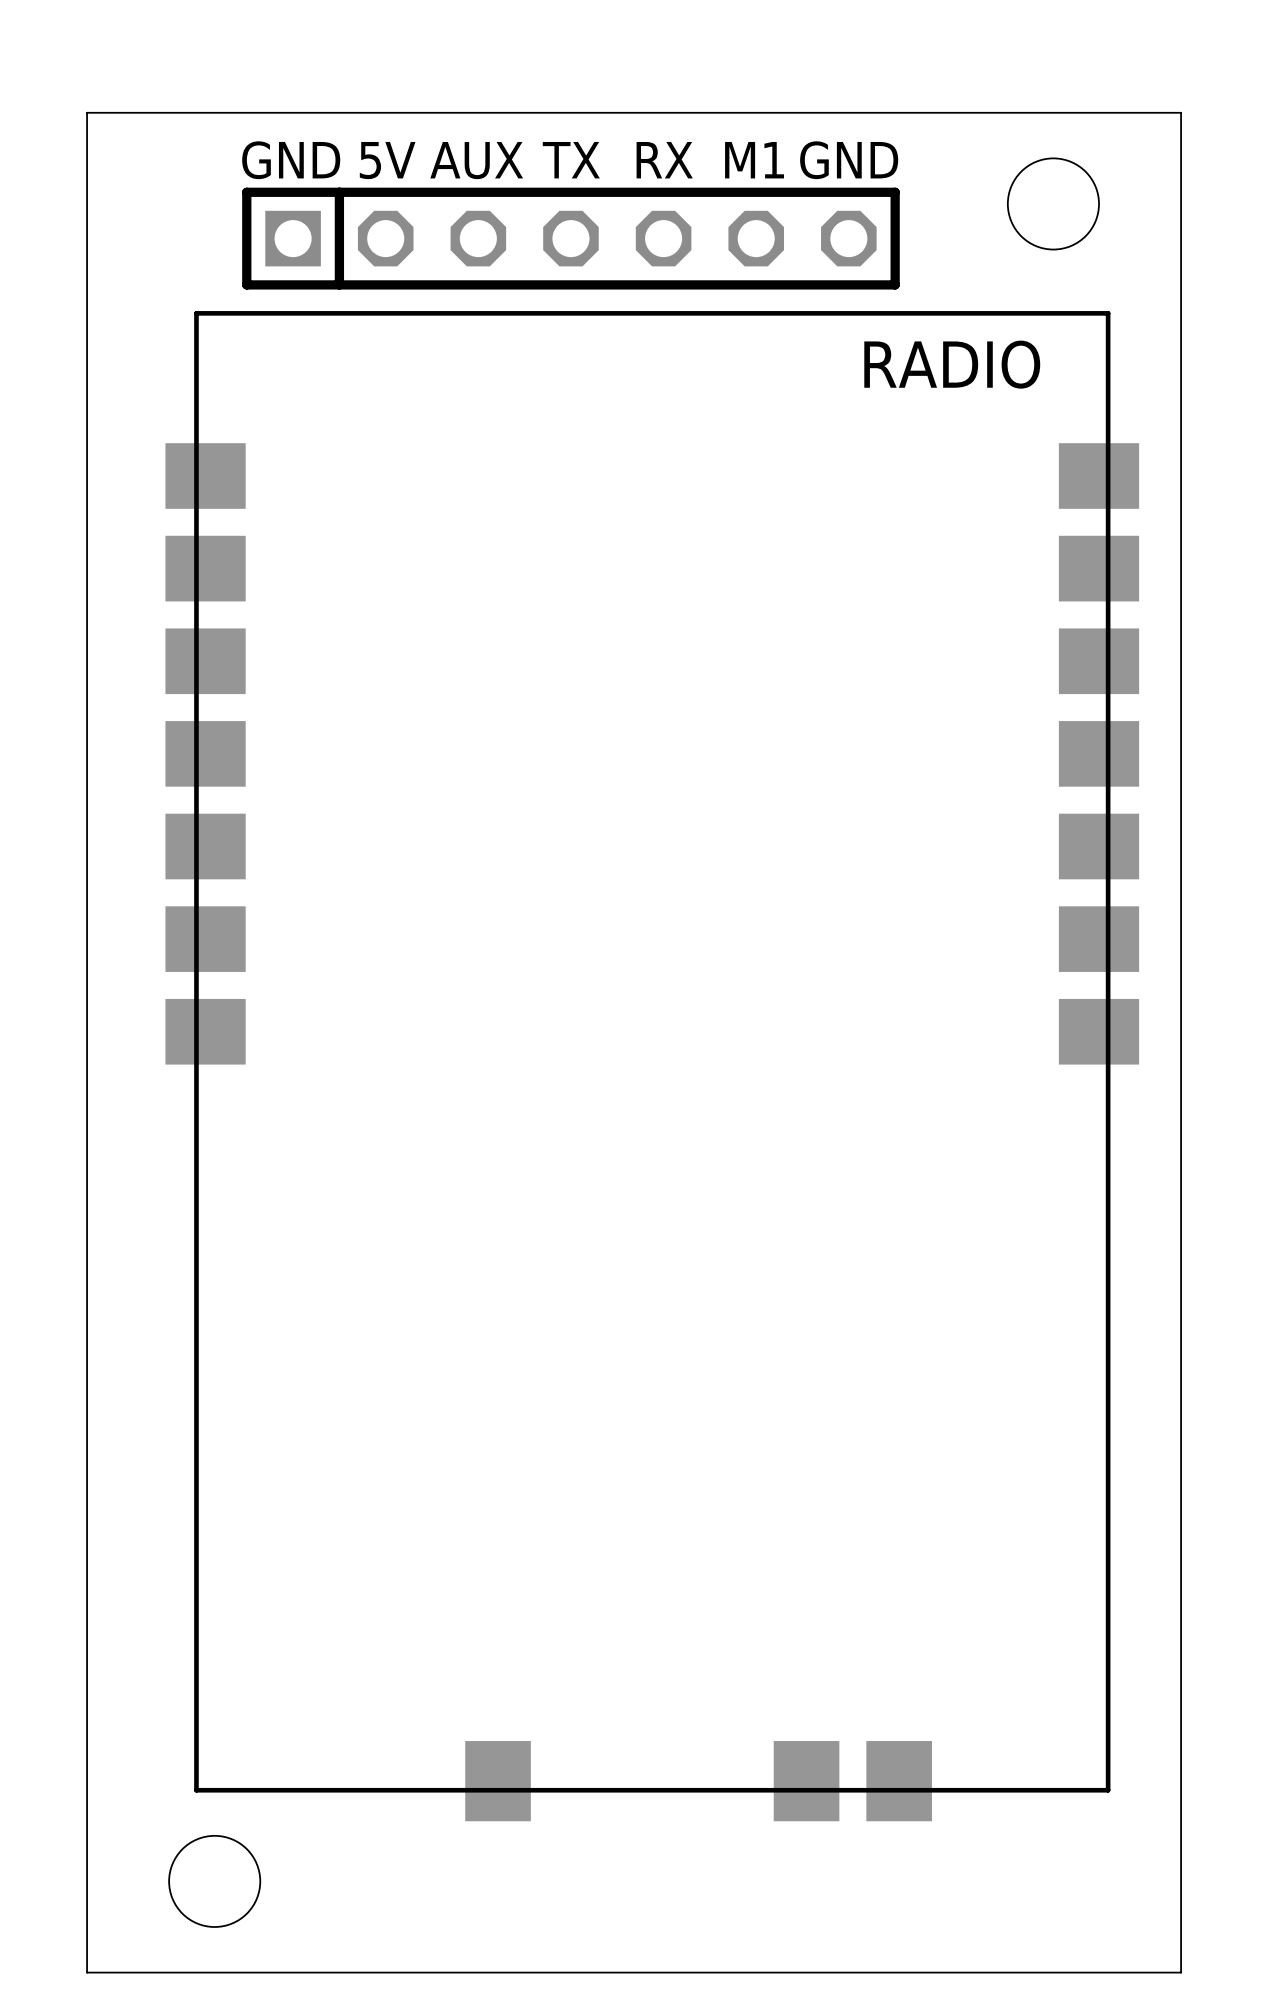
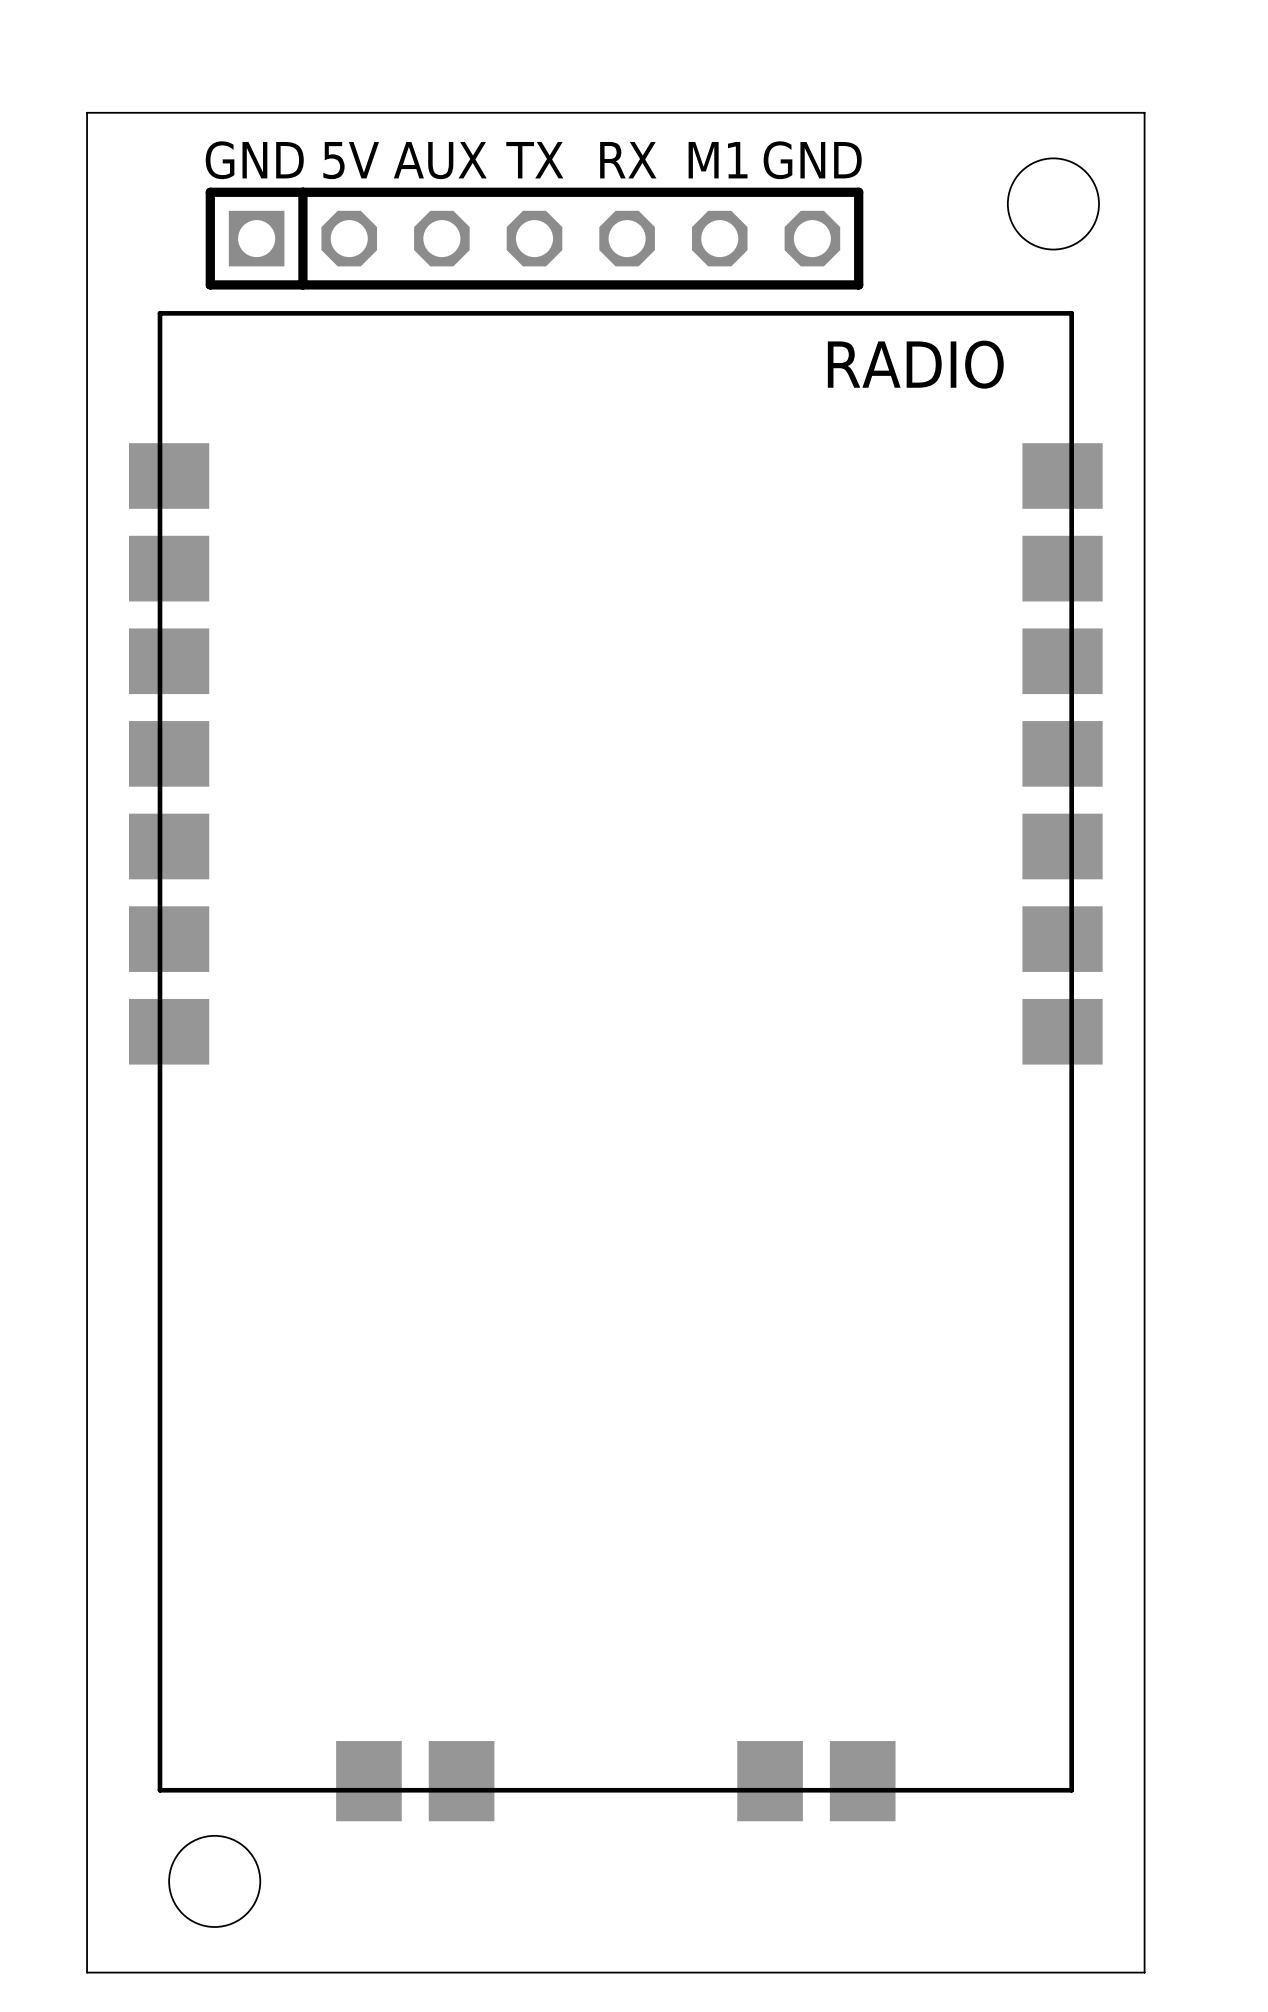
board edge: (1144, 112) (1181, 112) (1181, 1972) (1144, 1972) -> (1144, 112) (1144, 1972)
text position: GND (291, 160) -> GND (254, 160)
text position: 5V (387, 160) -> 5V (351, 160)
text position: AUX (476, 160) -> AUX (440, 160)
text position: TX (571, 160) -> TX (534, 160)
text position: RX (664, 160) -> RX (628, 160)
text position: M1 (754, 160) -> M1 (718, 160)
text position: GND (849, 160) -> GND (812, 160)
part position: (570, 238) -> (534, 238)
RADIO footprint: [165, 311, 1140, 1822] -> [128, 311, 1103, 1822]

